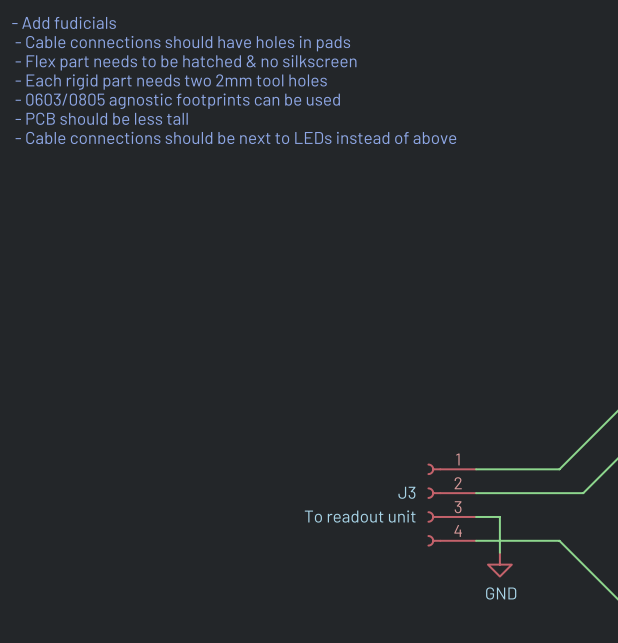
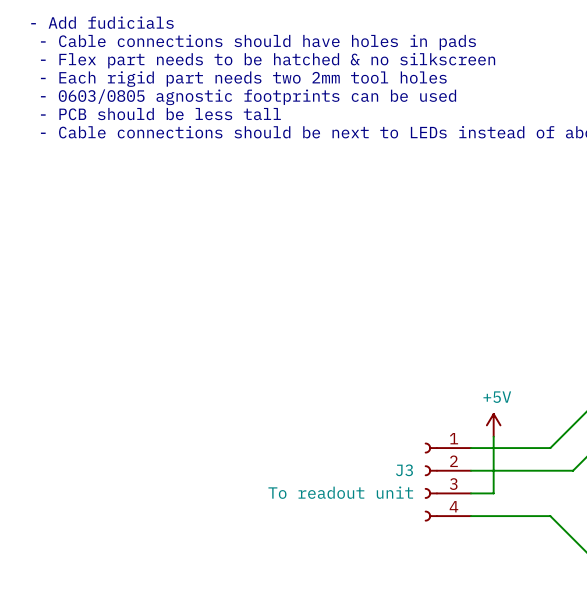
power symbol: none -> +5V (493, 425)
wire: (499, 516) (499, 552) -> (493, 493) (493, 436)
power symbol: GND (499, 564) -> none

